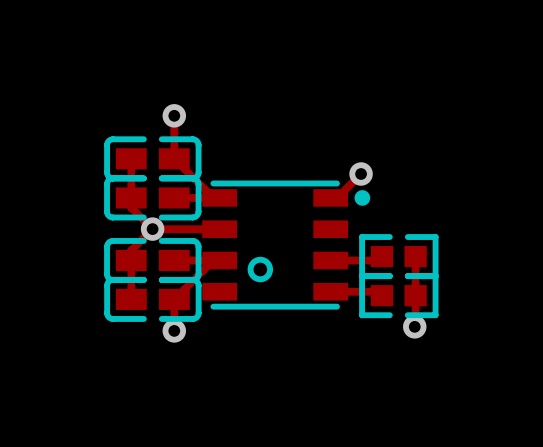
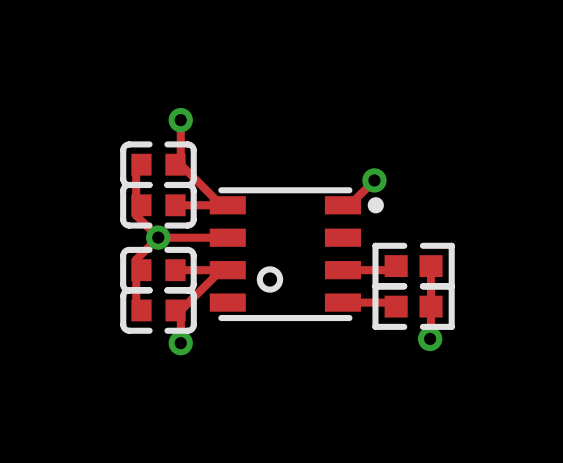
part footprint: [104, 136, 202, 182] -> [120, 141, 197, 189]
part footprint: [104, 175, 202, 221] -> [120, 181, 197, 229]
part footprint: [104, 238, 202, 284] -> [120, 246, 197, 294]
part footprint: [104, 276, 202, 322] -> [120, 287, 197, 334]

